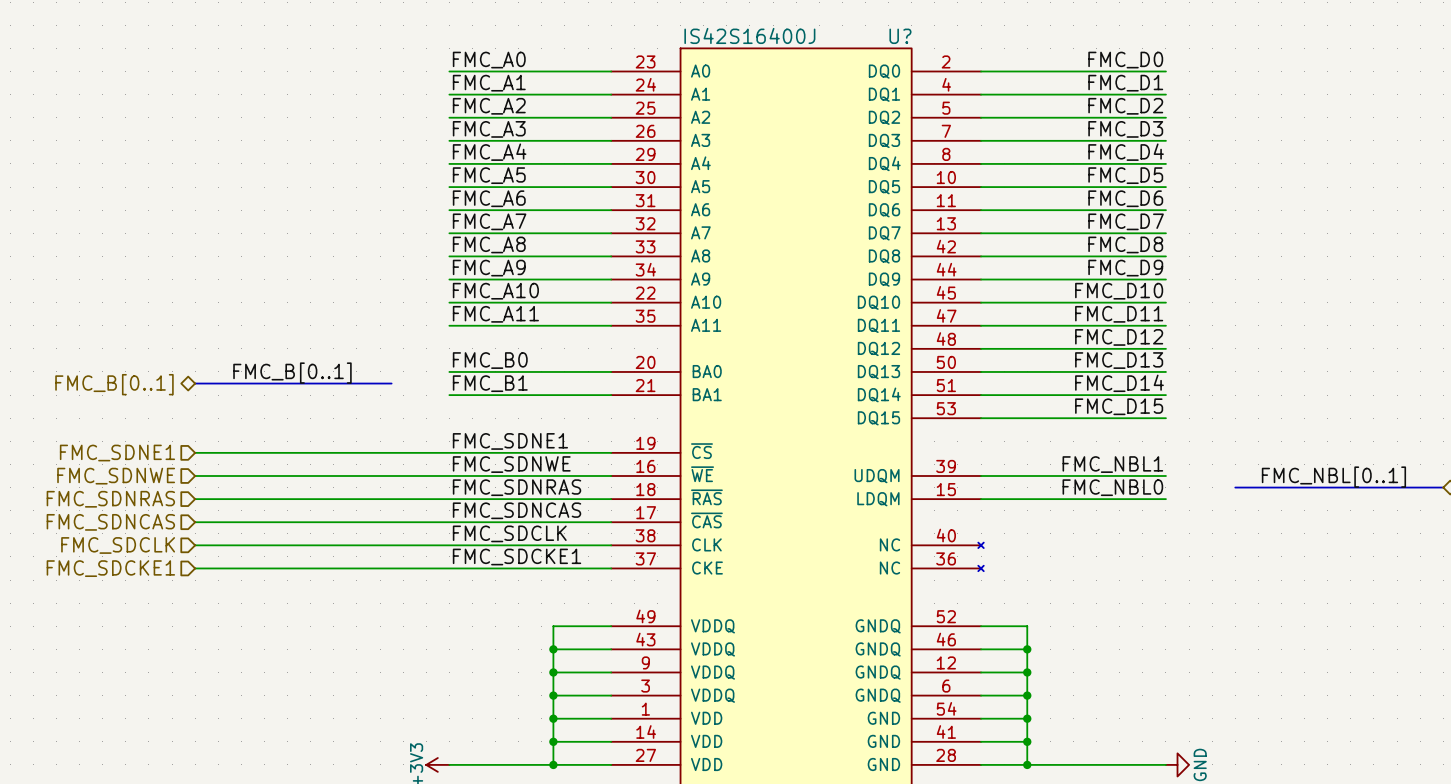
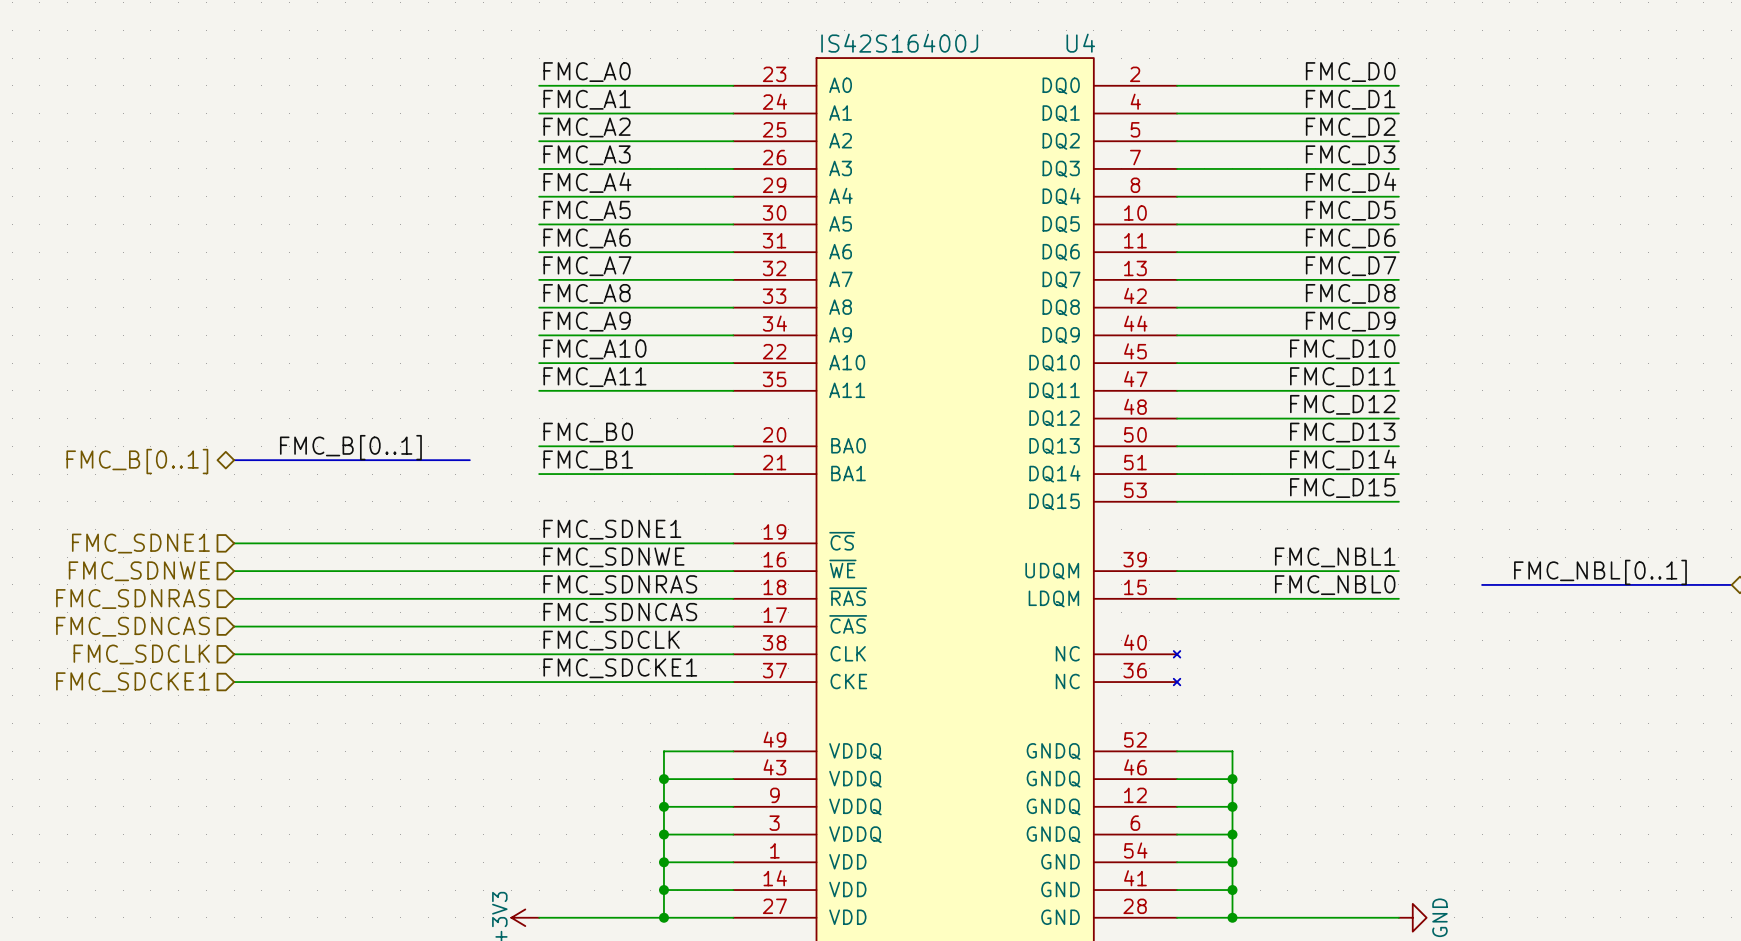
U? name: U? (900, 36) -> U4 (1080, 43)

